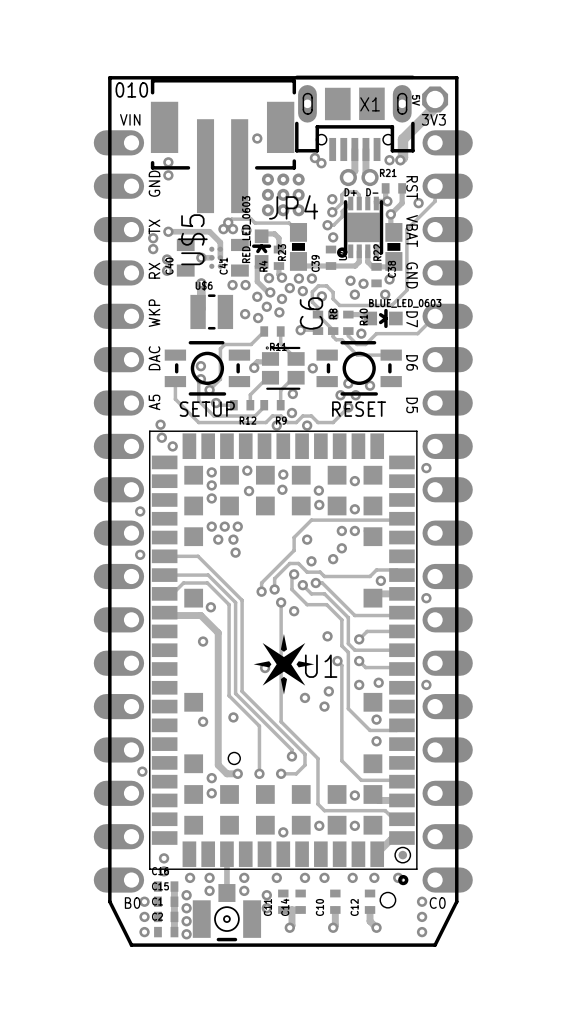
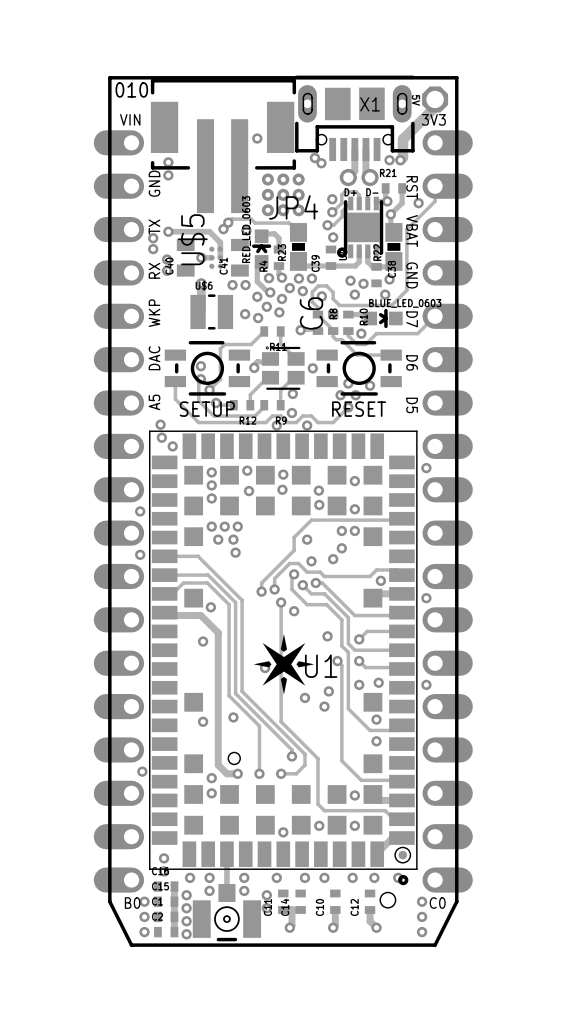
via: (233, 229) -> none

